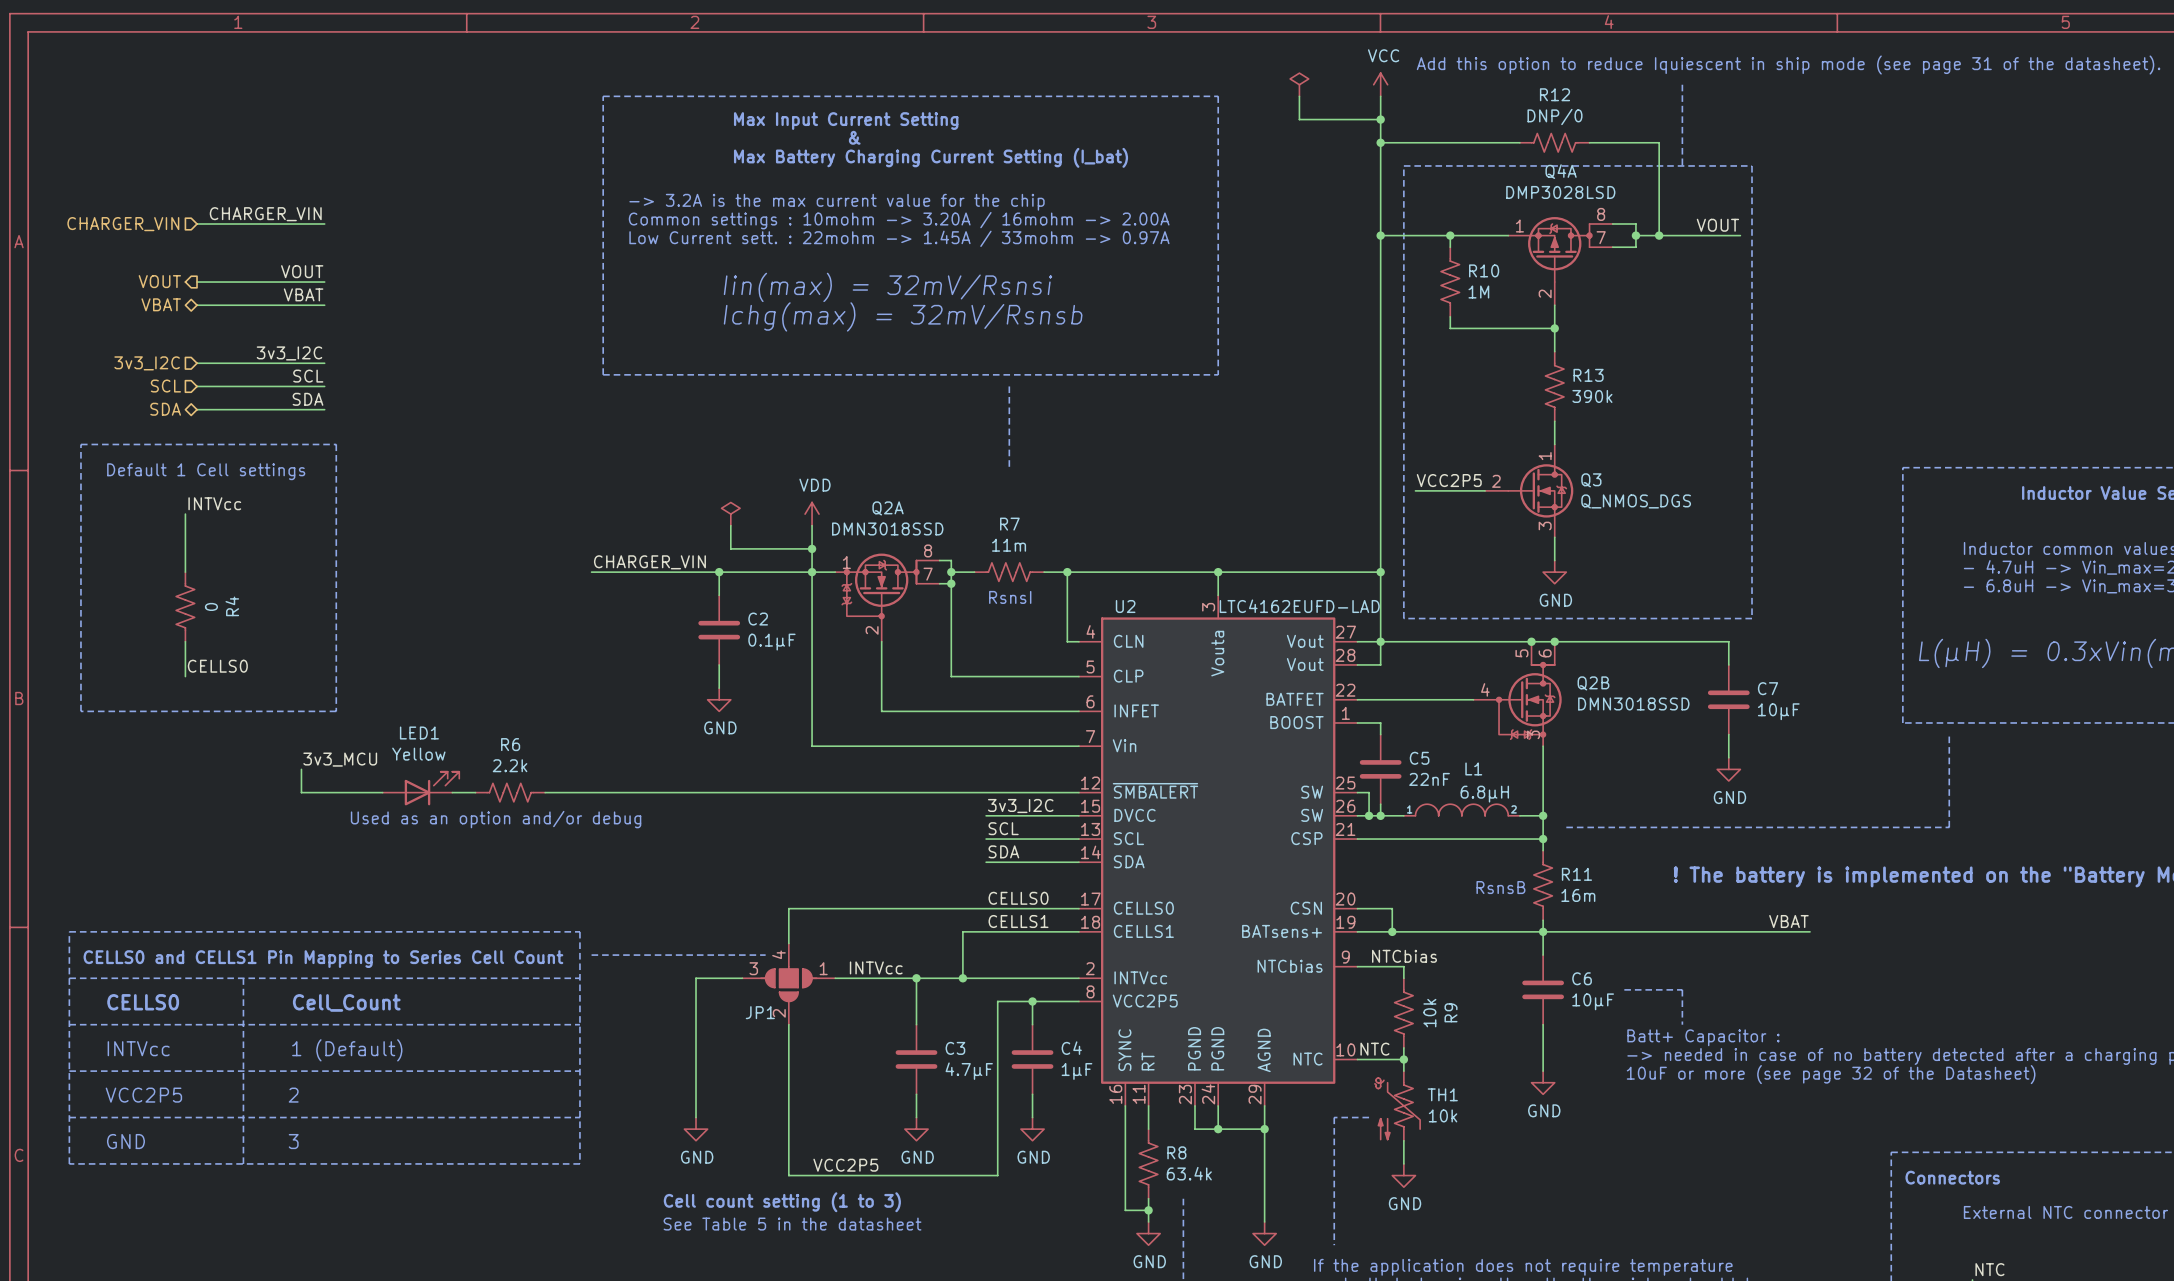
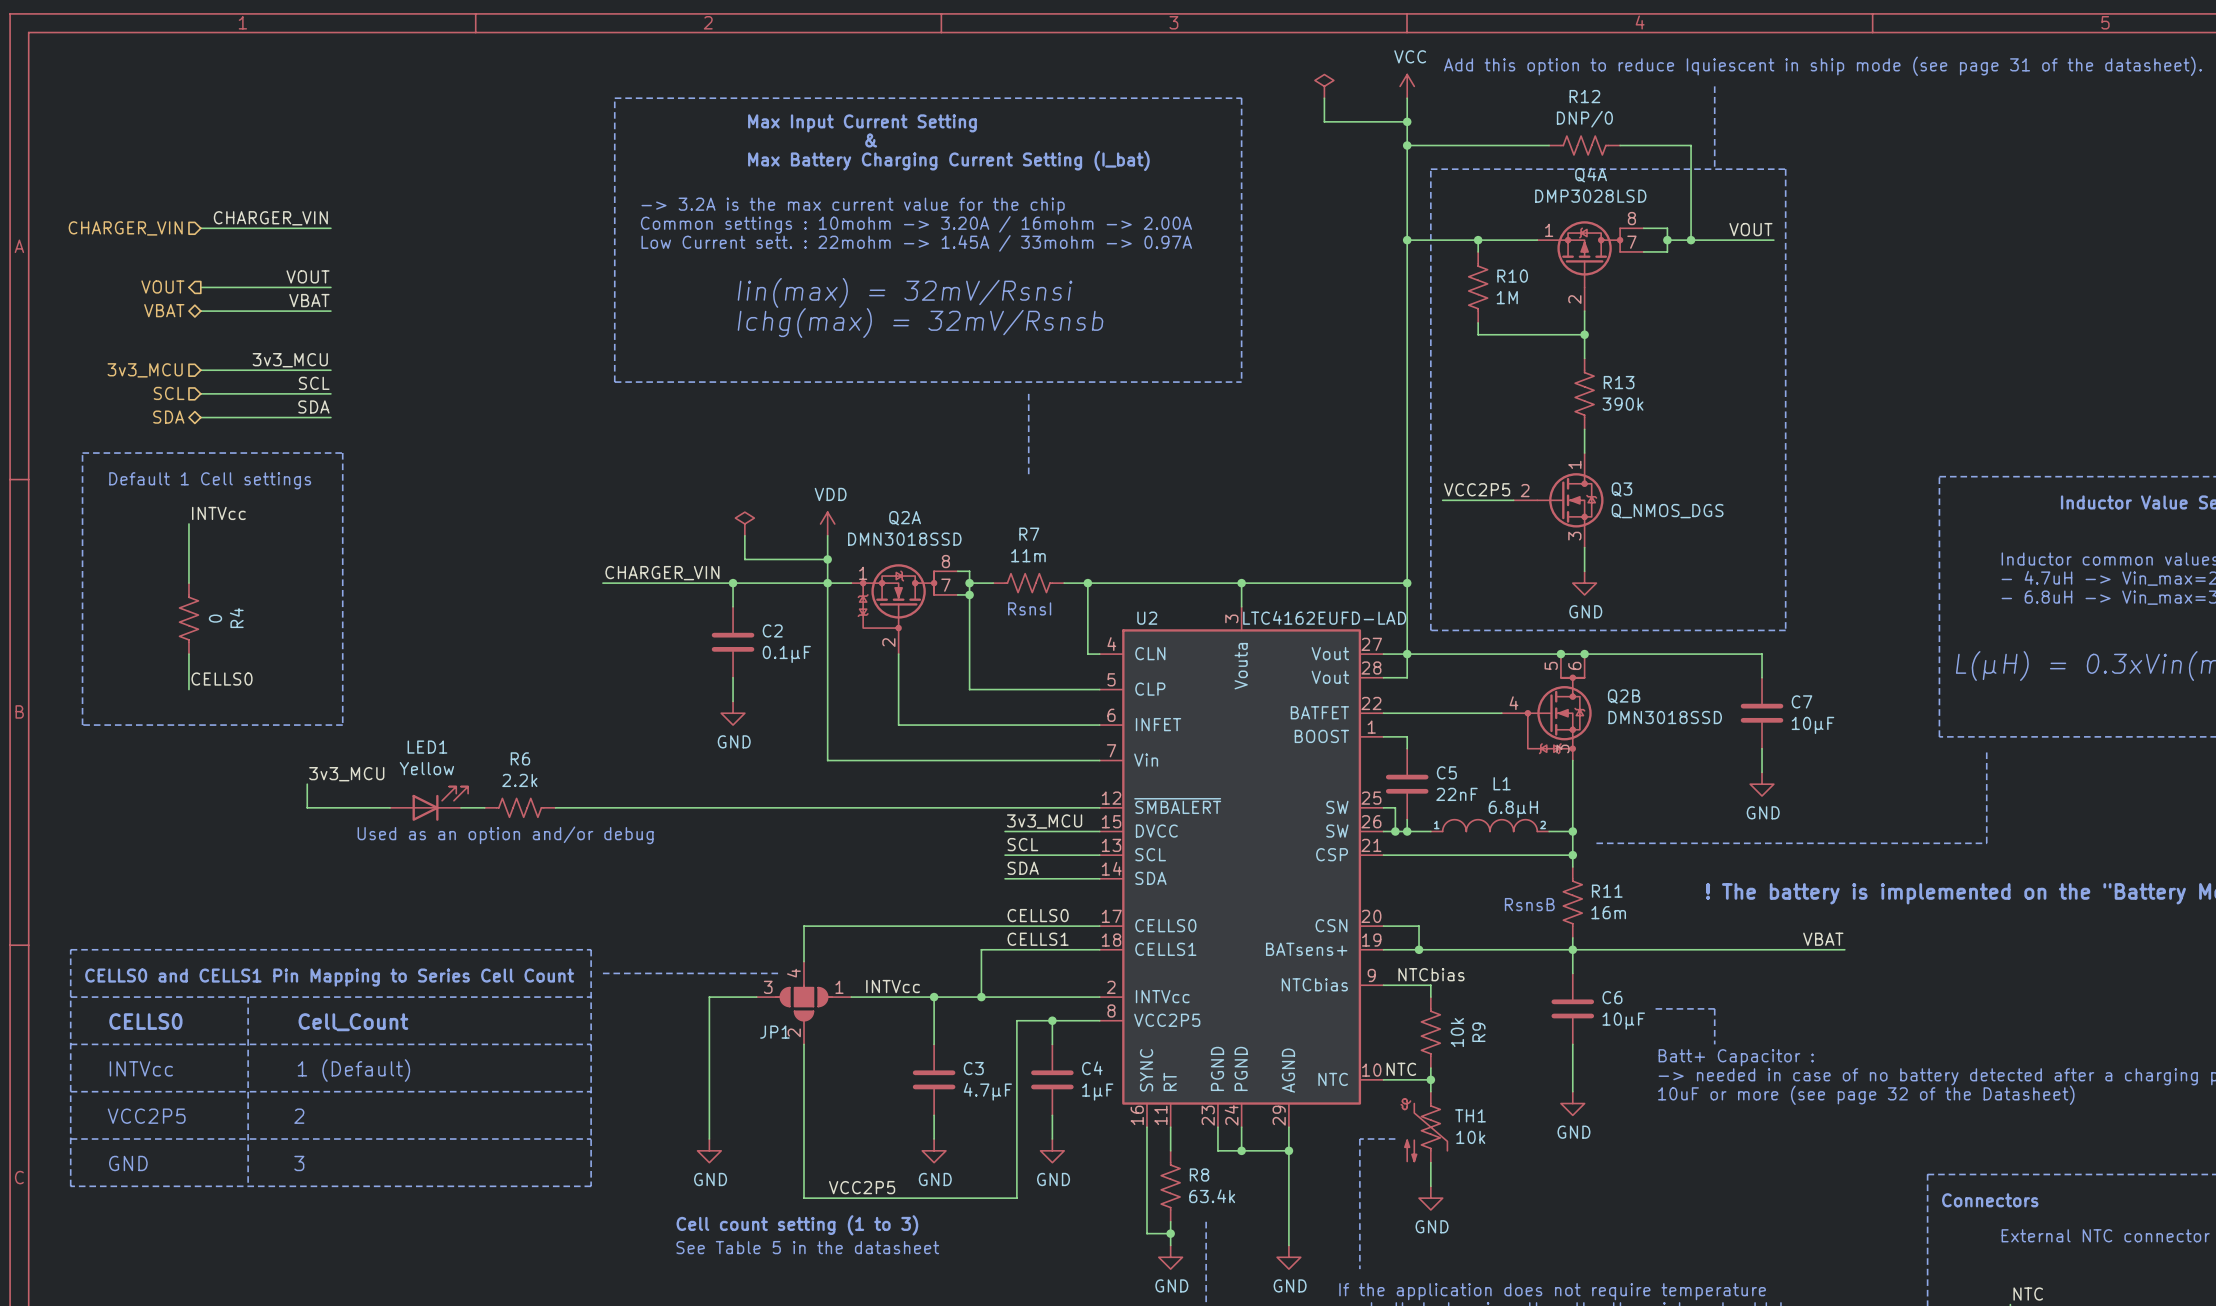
label: 3v3_I2C (289, 353) -> 3v3_MCU (290, 360)
hierarchical label: 3v3_I2C (147, 363) -> 3v3_MCU (145, 370)
label: 3v3_I2C (1020, 806) -> 3v3_MCU (1044, 821)

